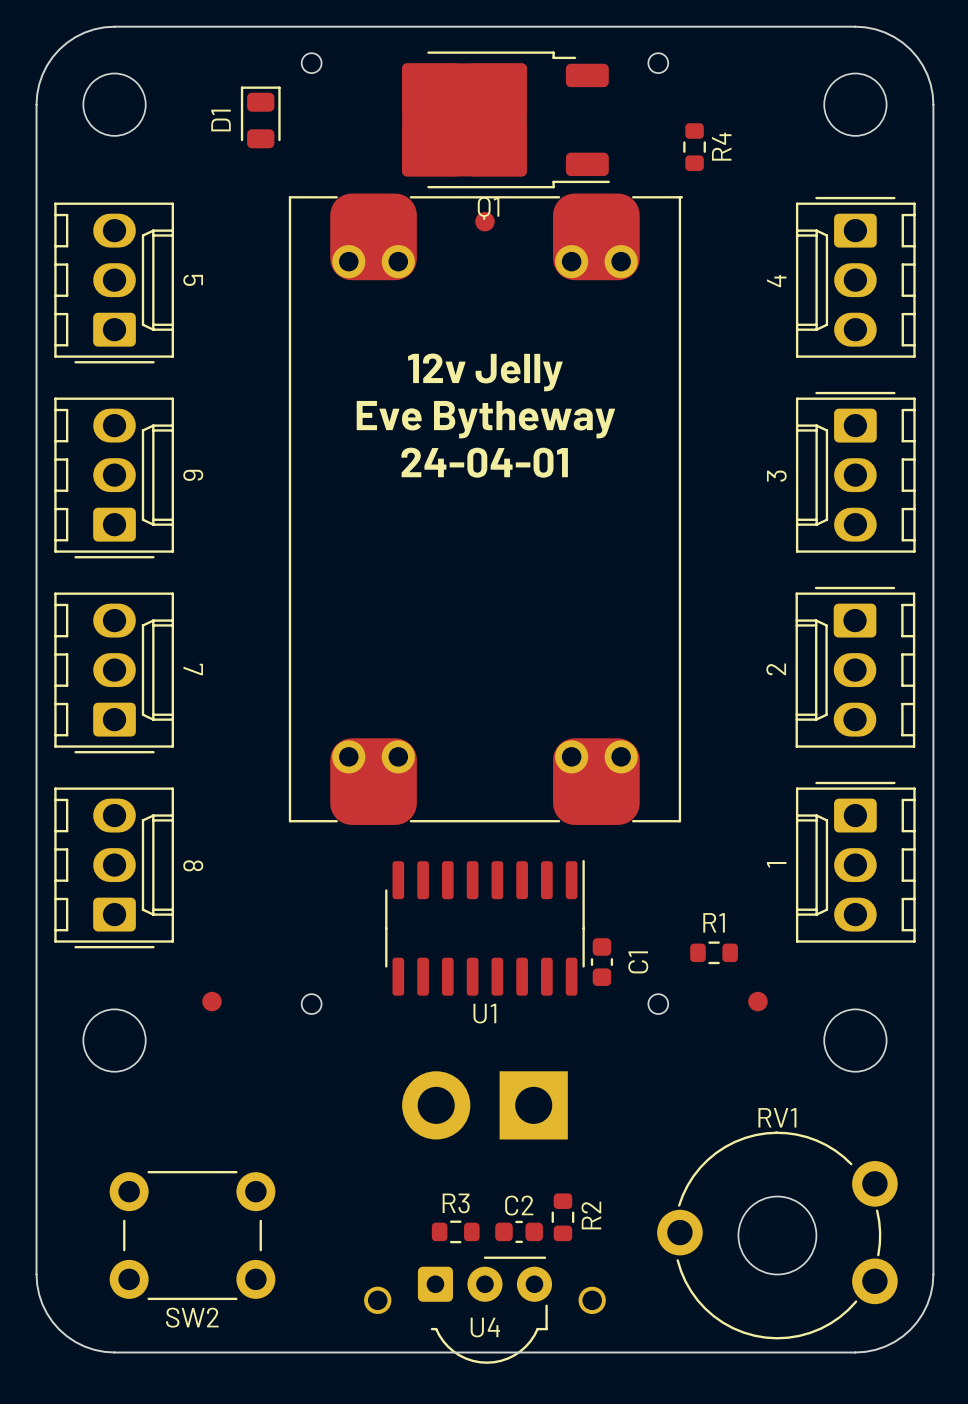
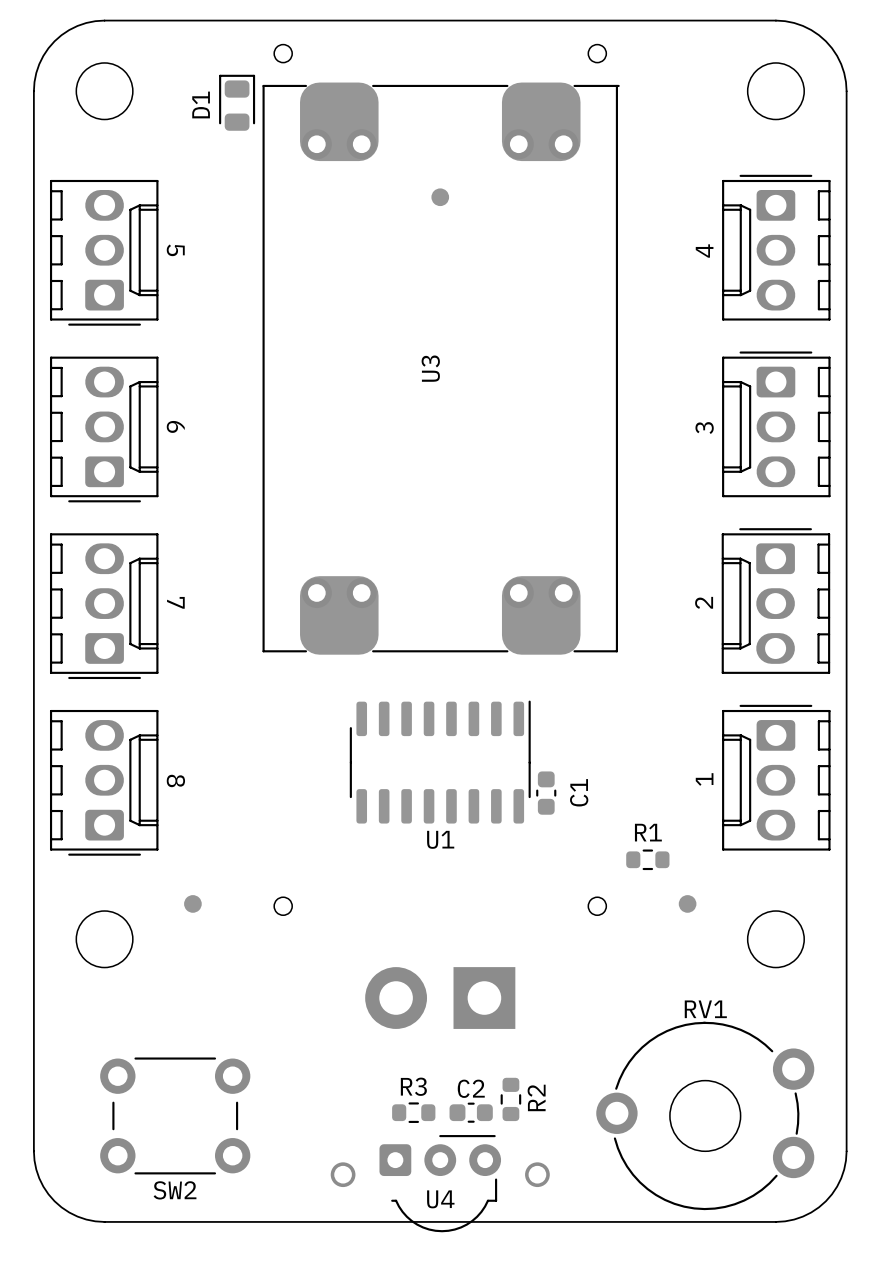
Q1: (506, 119) -> none
R4: (694, 147) -> none
text: 12v Jelly (485, 372) -> none
U3: none -> (441, 368)
text: Eve Bytheway (485, 419) -> none
text: 24-04-01 (484, 462) -> none
part: (485, 509) -> none
U1 position: (484, 927) -> (440, 762)
C1 position: (601, 962) -> (546, 793)

